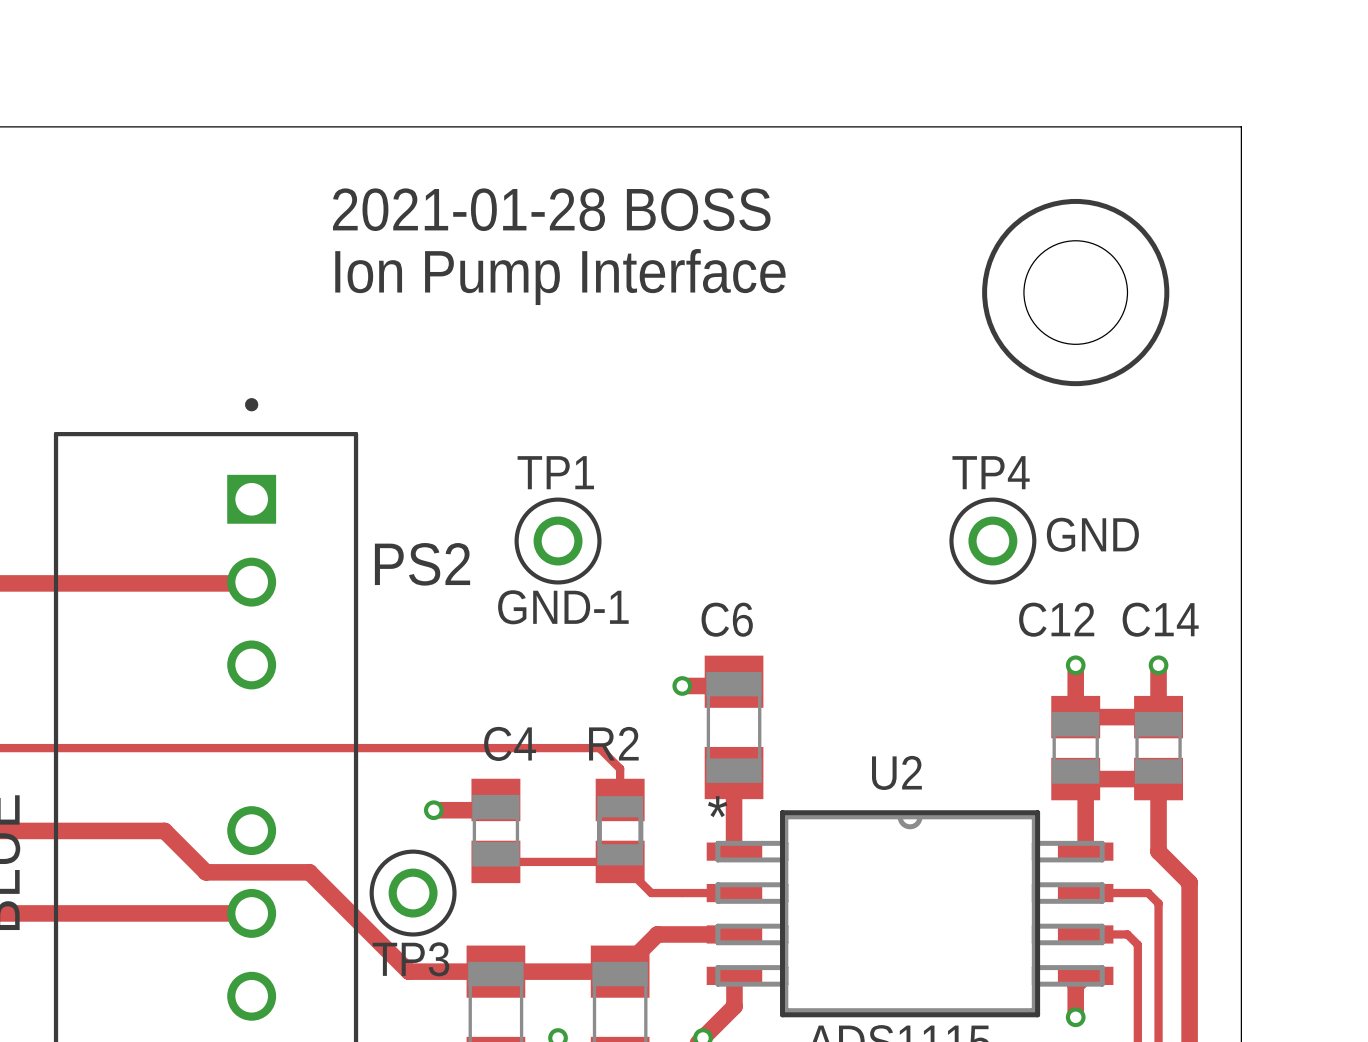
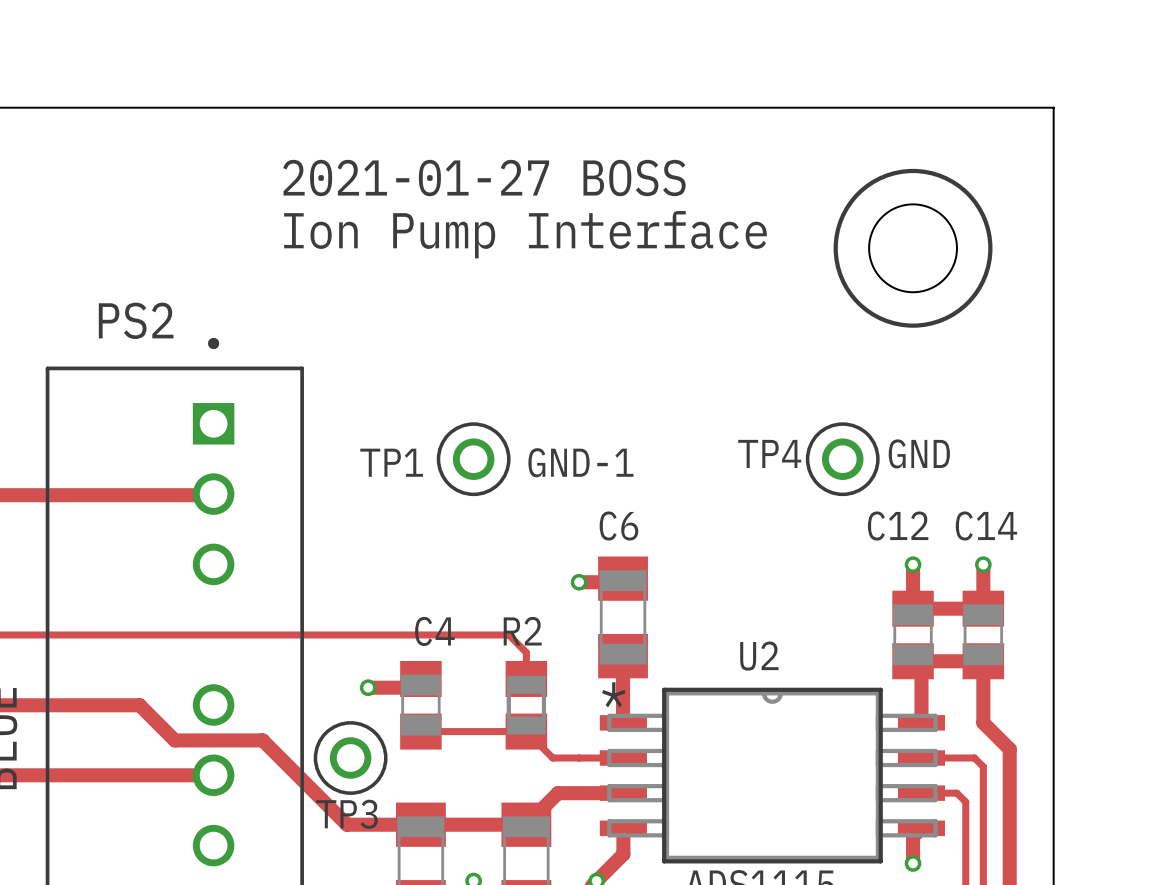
text: 2021-01-28 BOSS (551, 209) -> 2021-01-27 BOSS (484, 178)
TP1 name position: TP1 (555, 472) -> TP1 (391, 462)
TP4 name position: TP4 (991, 472) -> TP4 (769, 453)
PS2 name position: PS2 (422, 564) -> PS2 (136, 320)
text position: GND-1 (563, 607) -> GND-1 (580, 462)

